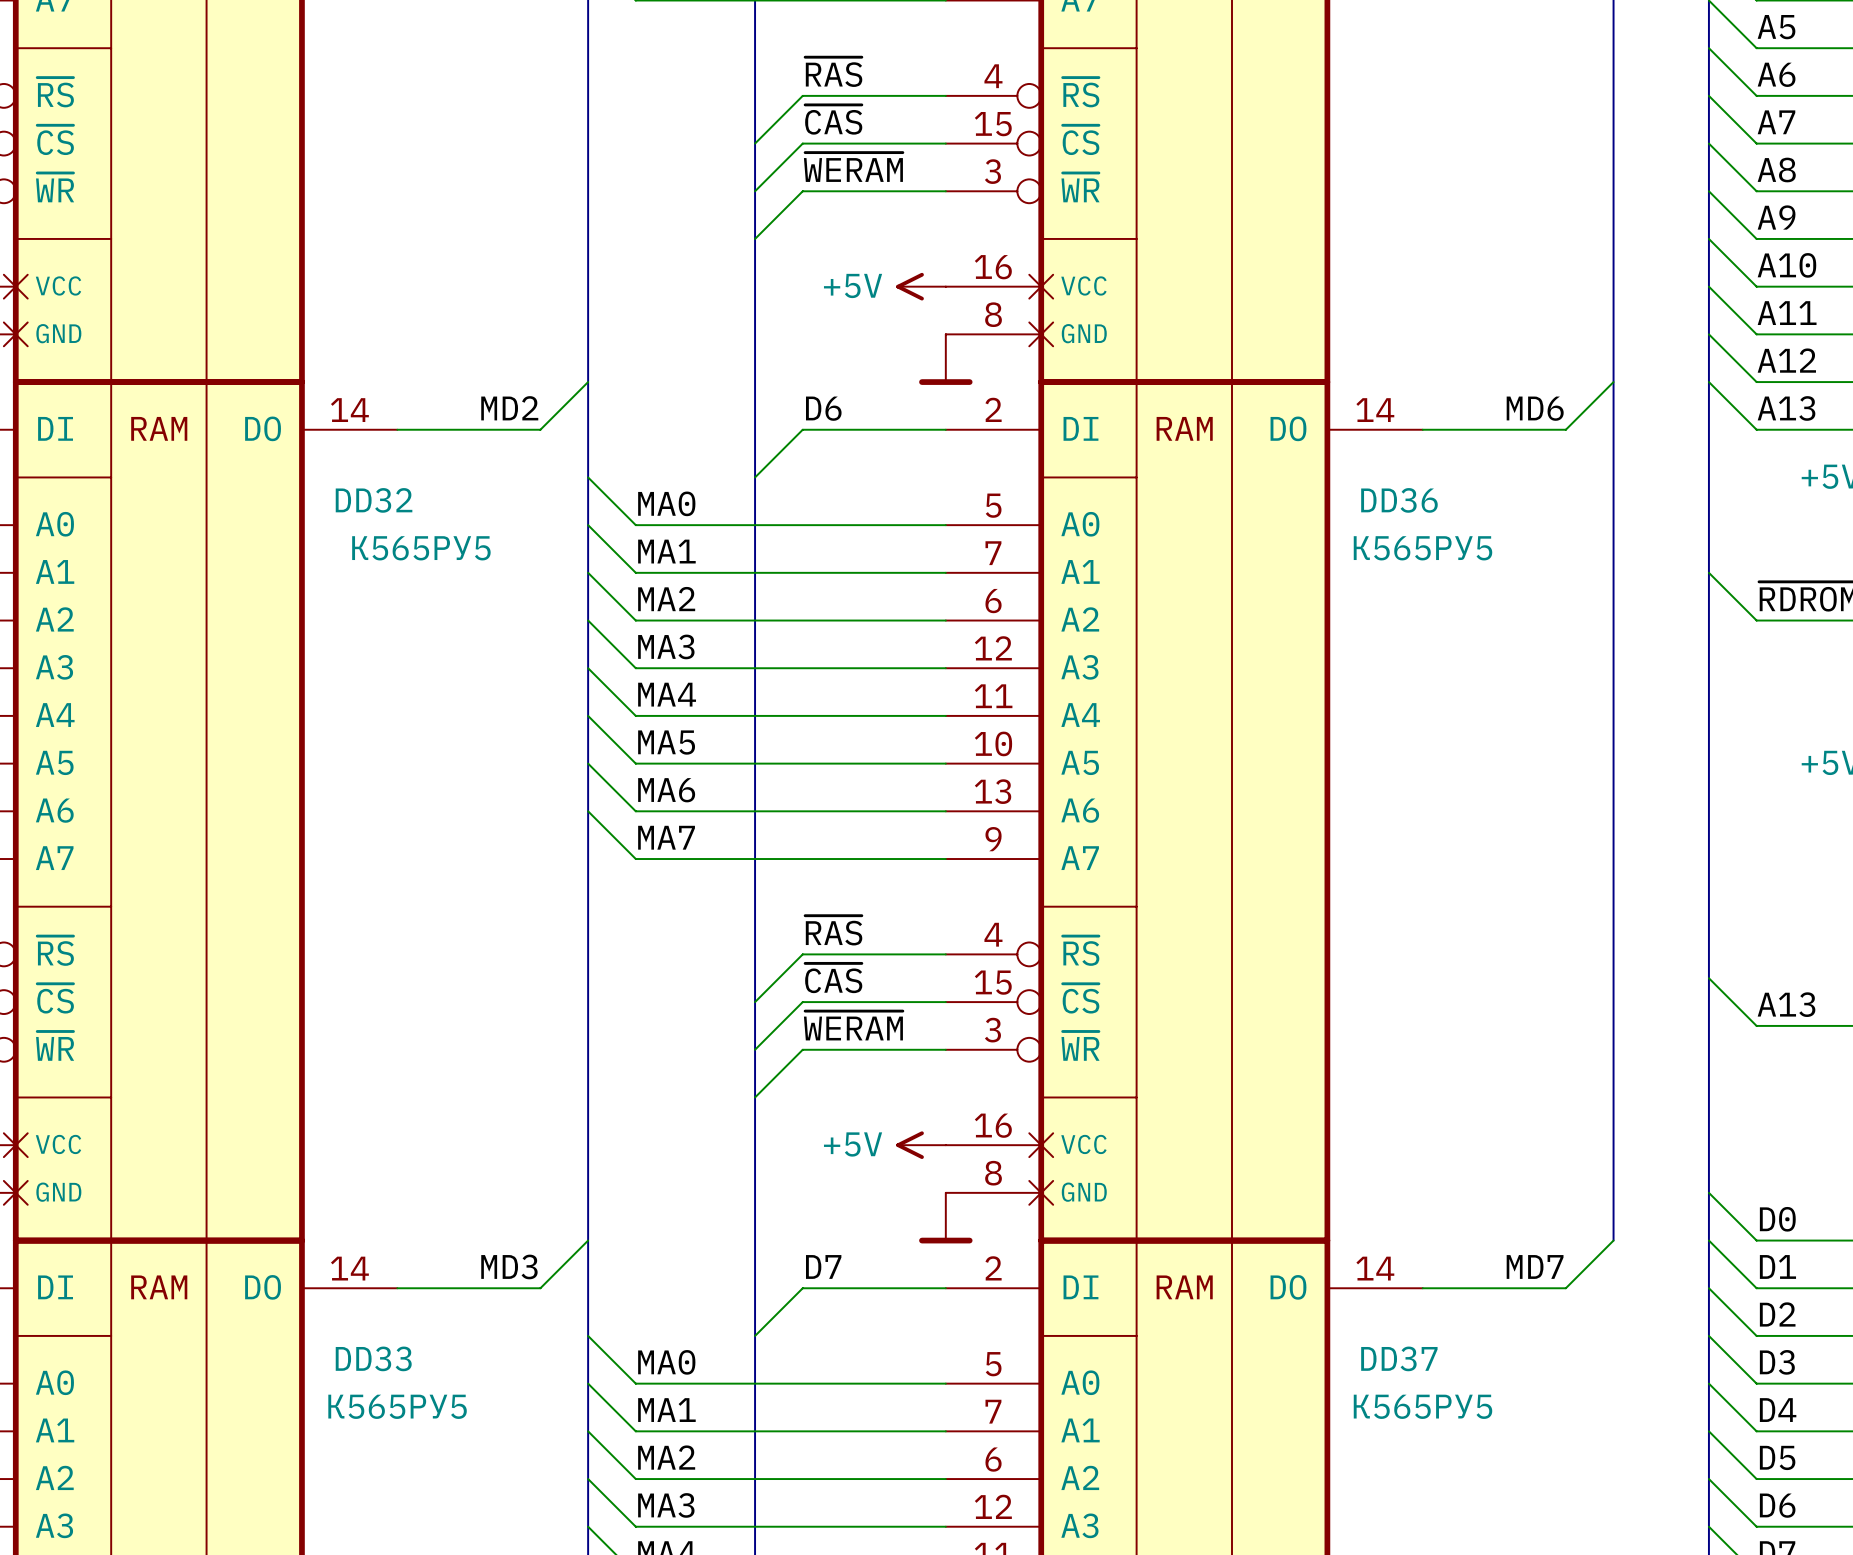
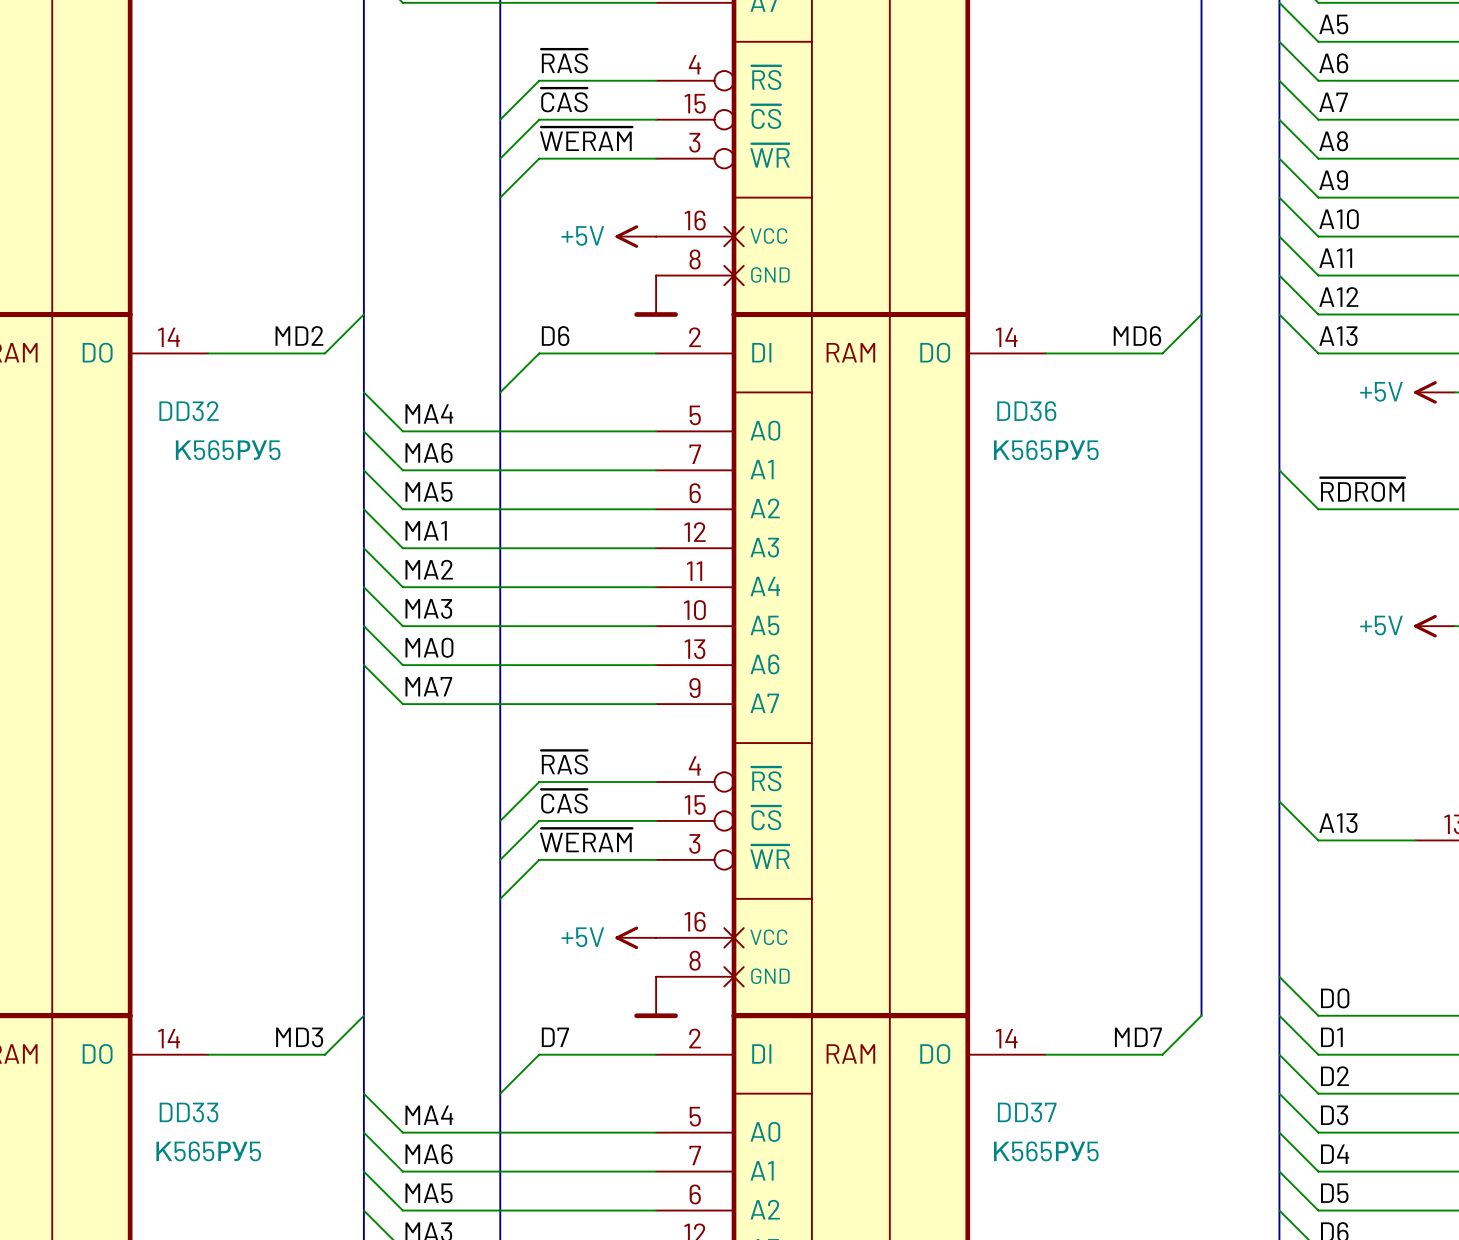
label: MA0 (666, 503) -> MA4 (429, 413)
label: MA1 (666, 551) -> MA6 (429, 452)
label: MA2 (666, 599) -> MA5 (429, 492)
label: MA3 (666, 646) -> MA1 (426, 530)
label: MA4 (667, 694) -> MA2 (429, 569)
label: MA5 (666, 742) -> MA3 (428, 608)
label: MA6 (666, 790) -> MA0 (429, 647)
label: MA0 (666, 1362) -> MA4 (429, 1115)
label: MA1 (666, 1410) -> MA6 (429, 1154)
label: MA2 (666, 1457) -> MA5 (429, 1193)

